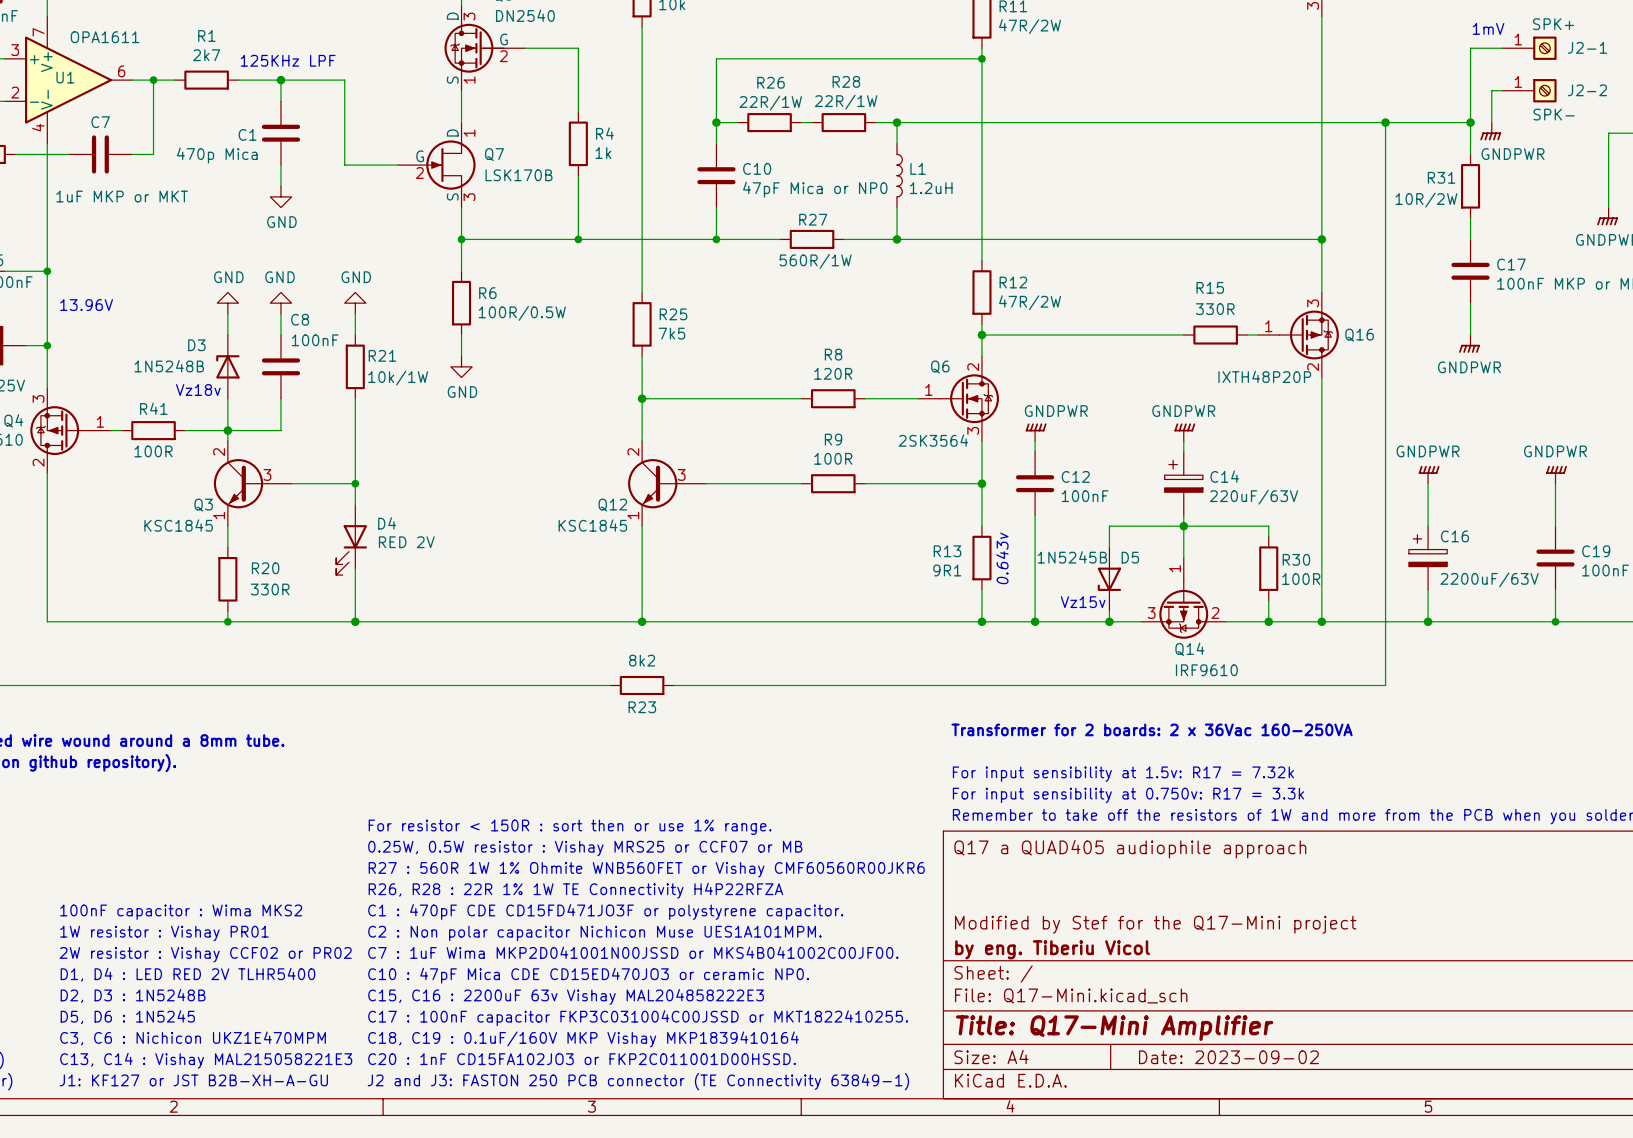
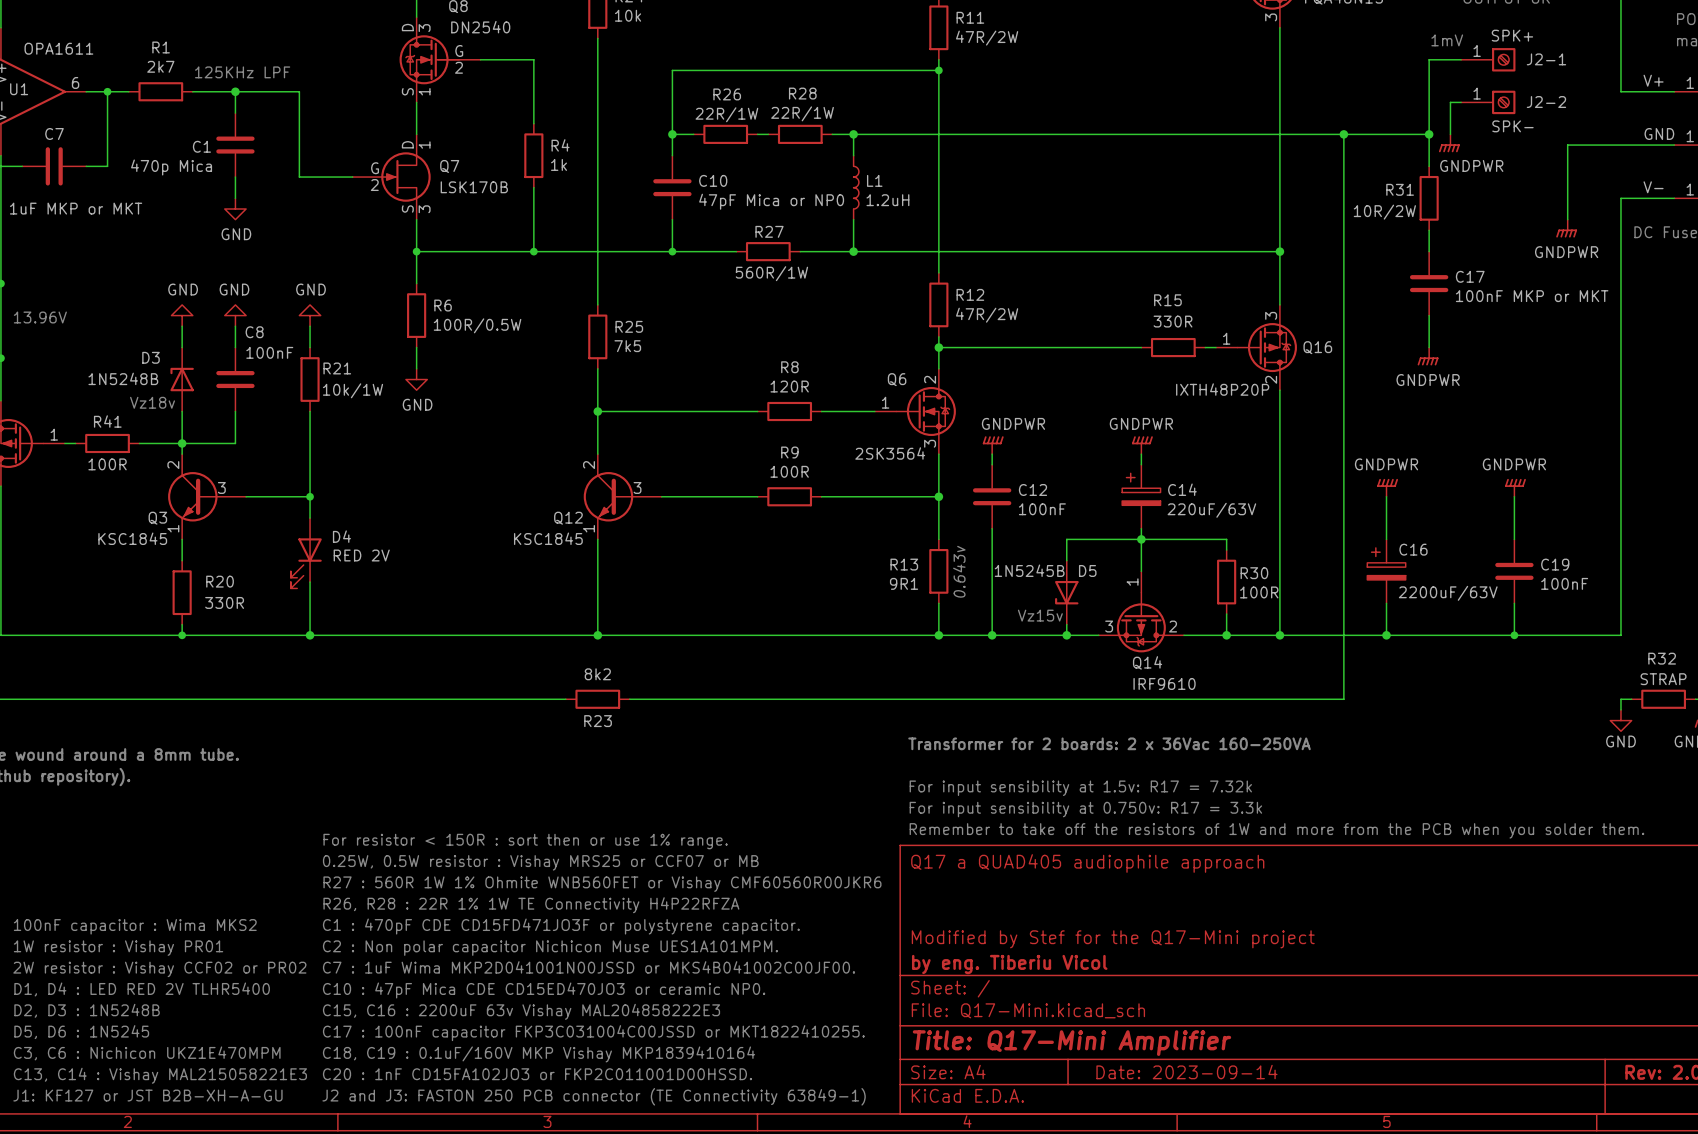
title block: Date: 2023-09-02 (1228, 1057) -> Date: 2023-09-14 (1186, 1072)

